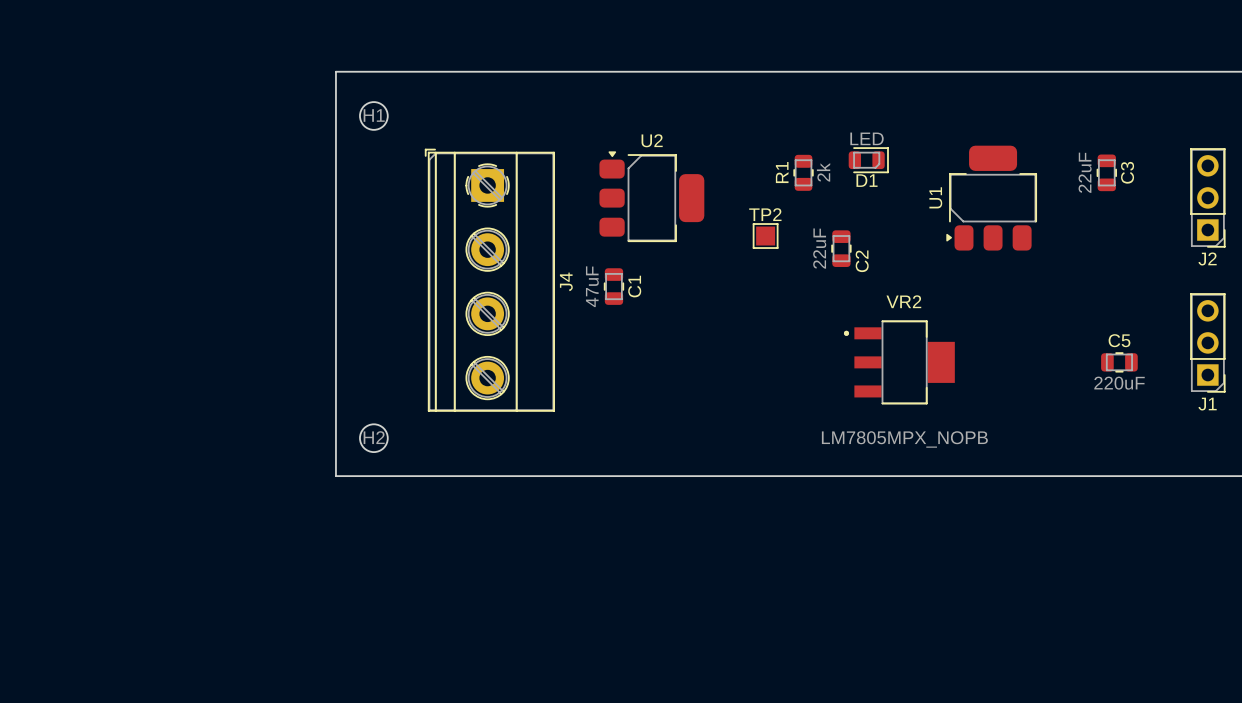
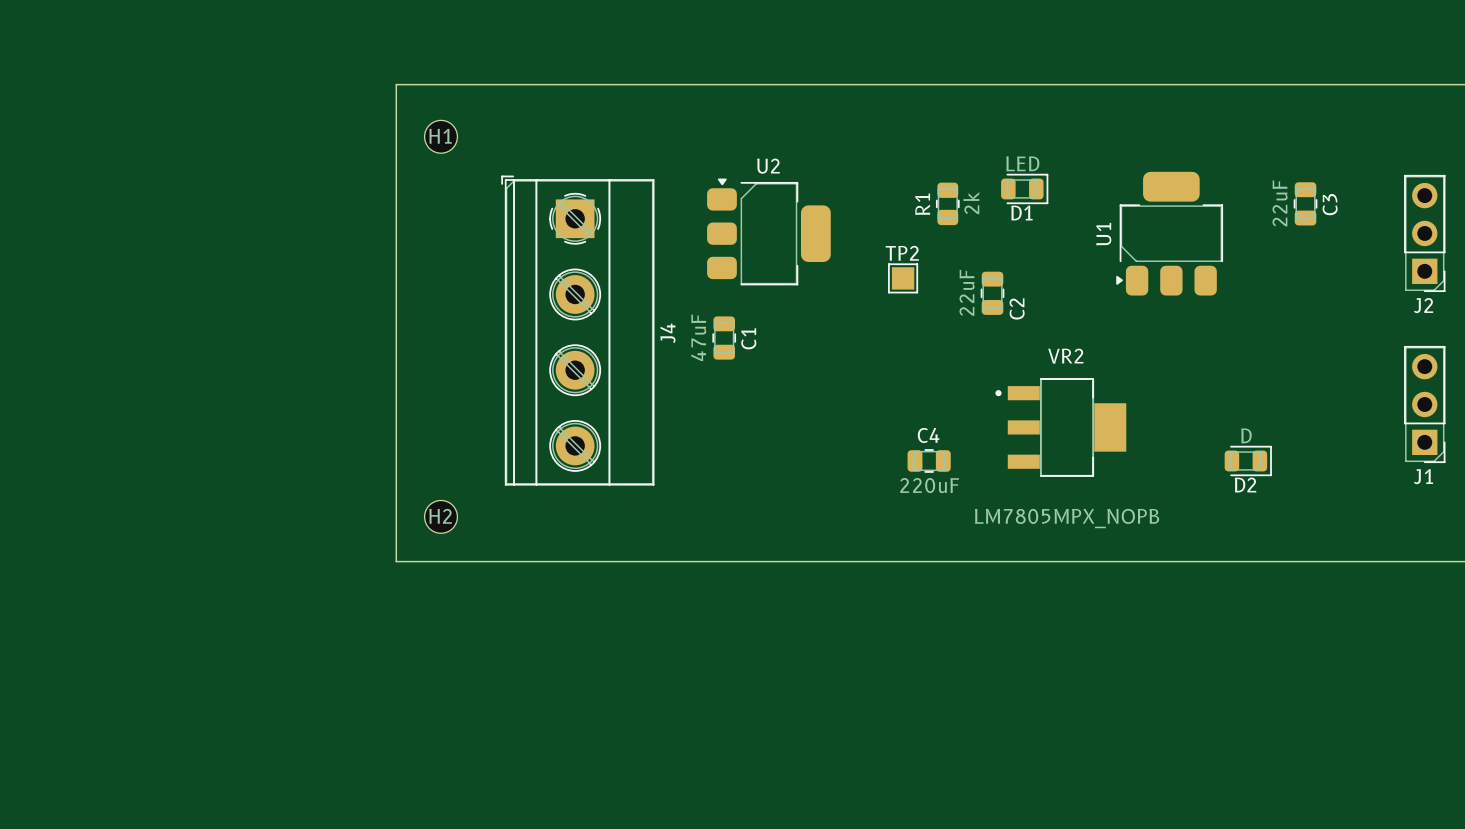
C5: 220uF (1119, 362) -> none
C4: none -> 220uF (929, 460)
D2: none -> D (1248, 460)

